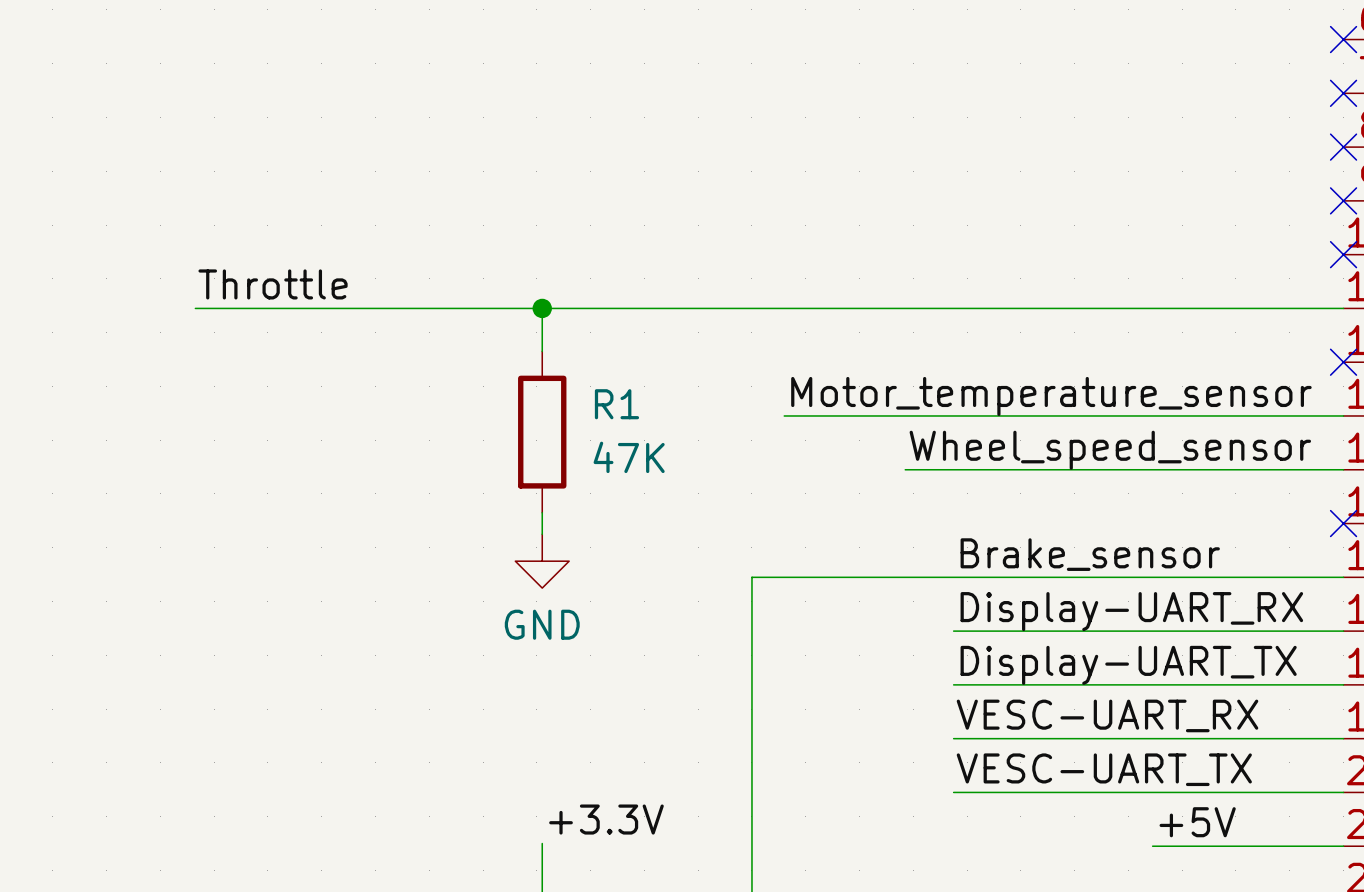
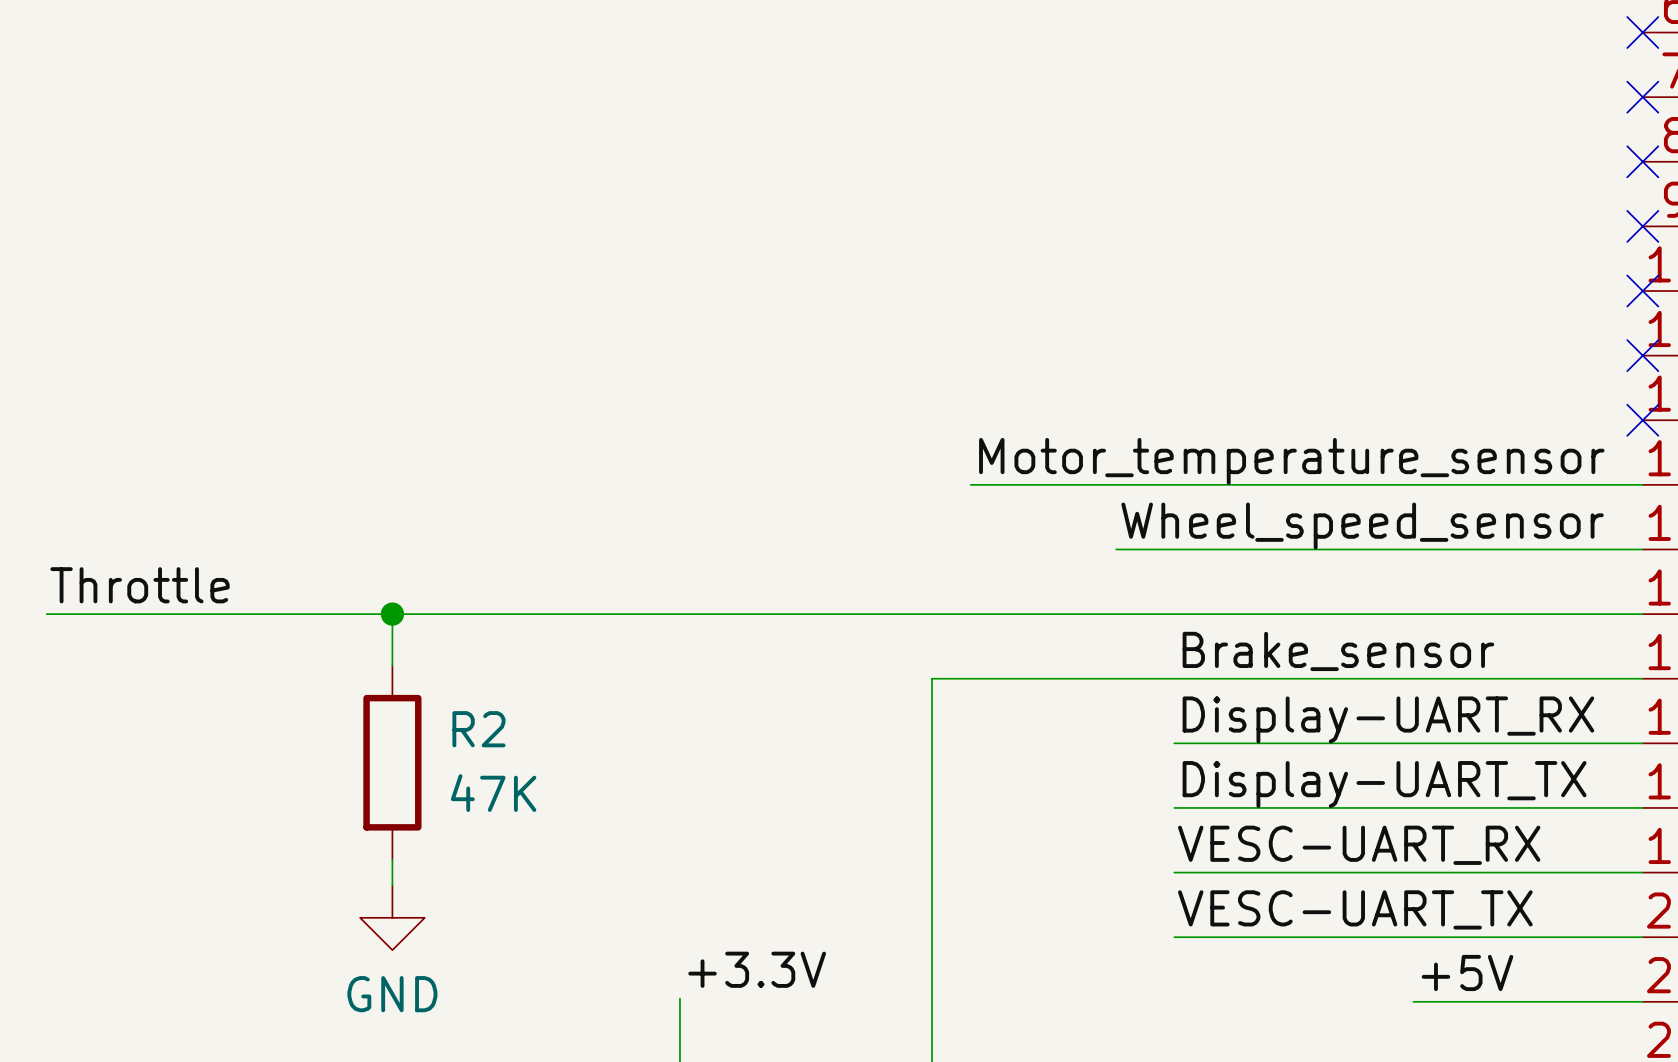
label position: Throttle (273, 284) -> Throttle (140, 585)
wire: (195, 308) (1343, 308) -> none
wire: (542, 308) (542, 351) -> (392, 614) (392, 665)
junction: (542, 308) -> none
no-connect mark: none -> (1642, 355)
R1: 47K (542, 432) -> none
wire: (542, 512) (542, 534) -> (392, 859) (392, 885)
wire: none -> (46, 614) (1642, 614)
junction: none -> (392, 614)
no-connect mark: (1343, 523) -> none
power symbol position: GND (542, 561) -> GND (392, 917)
R2: none -> 47K (392, 762)

